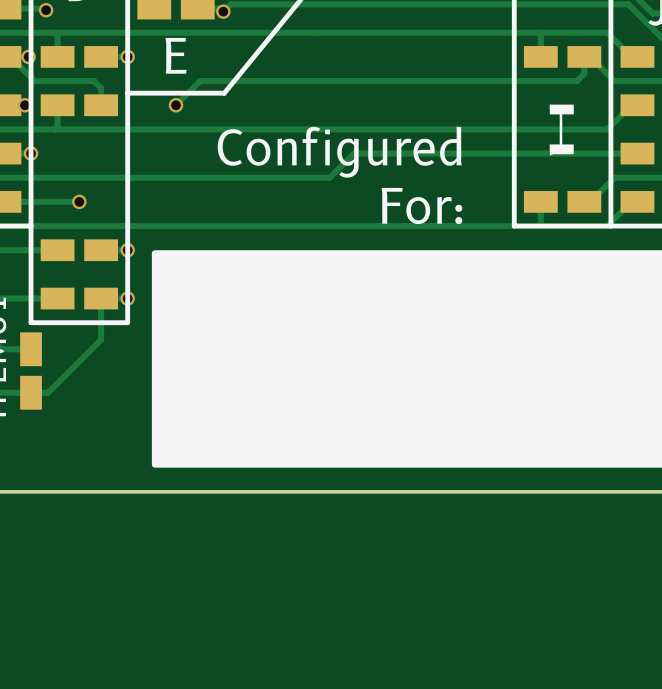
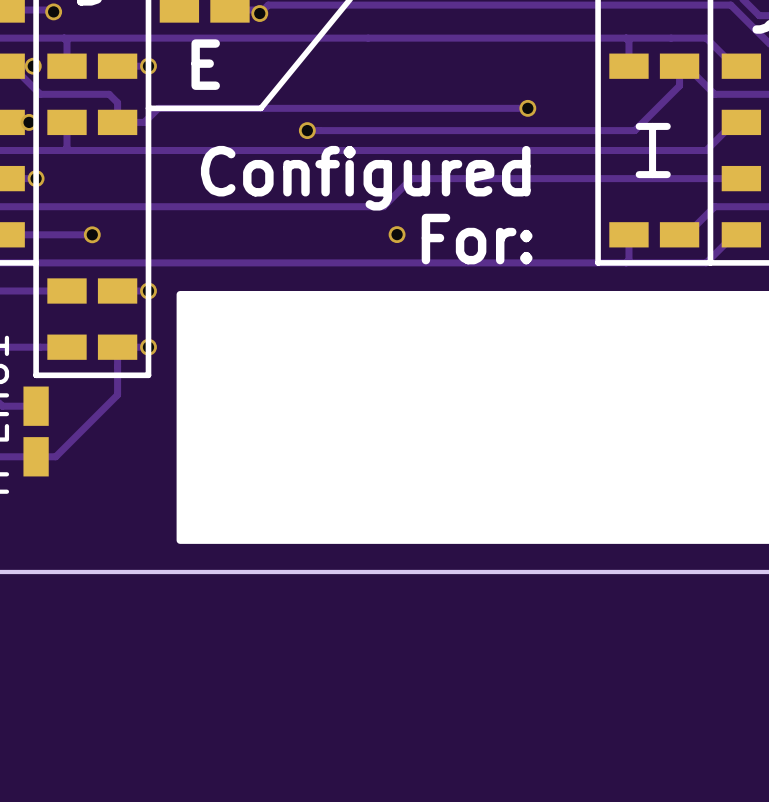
track: (577, 81) (200, 81) (176, 105) -> (671, 94) (634, 130) (307, 130)
track: none -> (527, 108) (158, 108) (144, 122) (117, 122)
via: none -> (527, 108)
via position: (176, 105) -> (307, 130)
via: none -> (397, 234)

